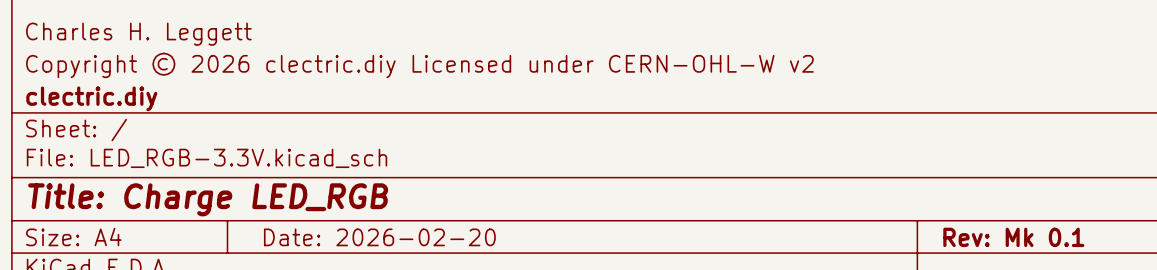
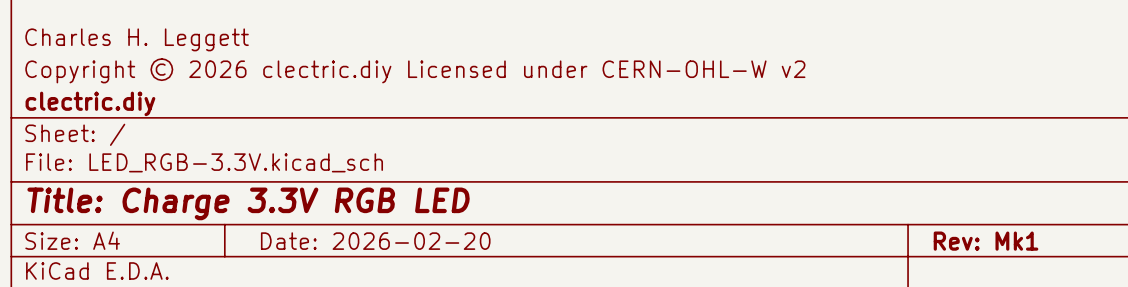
title block: Title: Charge LED_RGB (208, 199) -> Title: Charge 3.3V RGB LED (248, 203)
title block: Rev: Mk 0.1 (1013, 237) -> Rev: Mk1 (986, 241)

